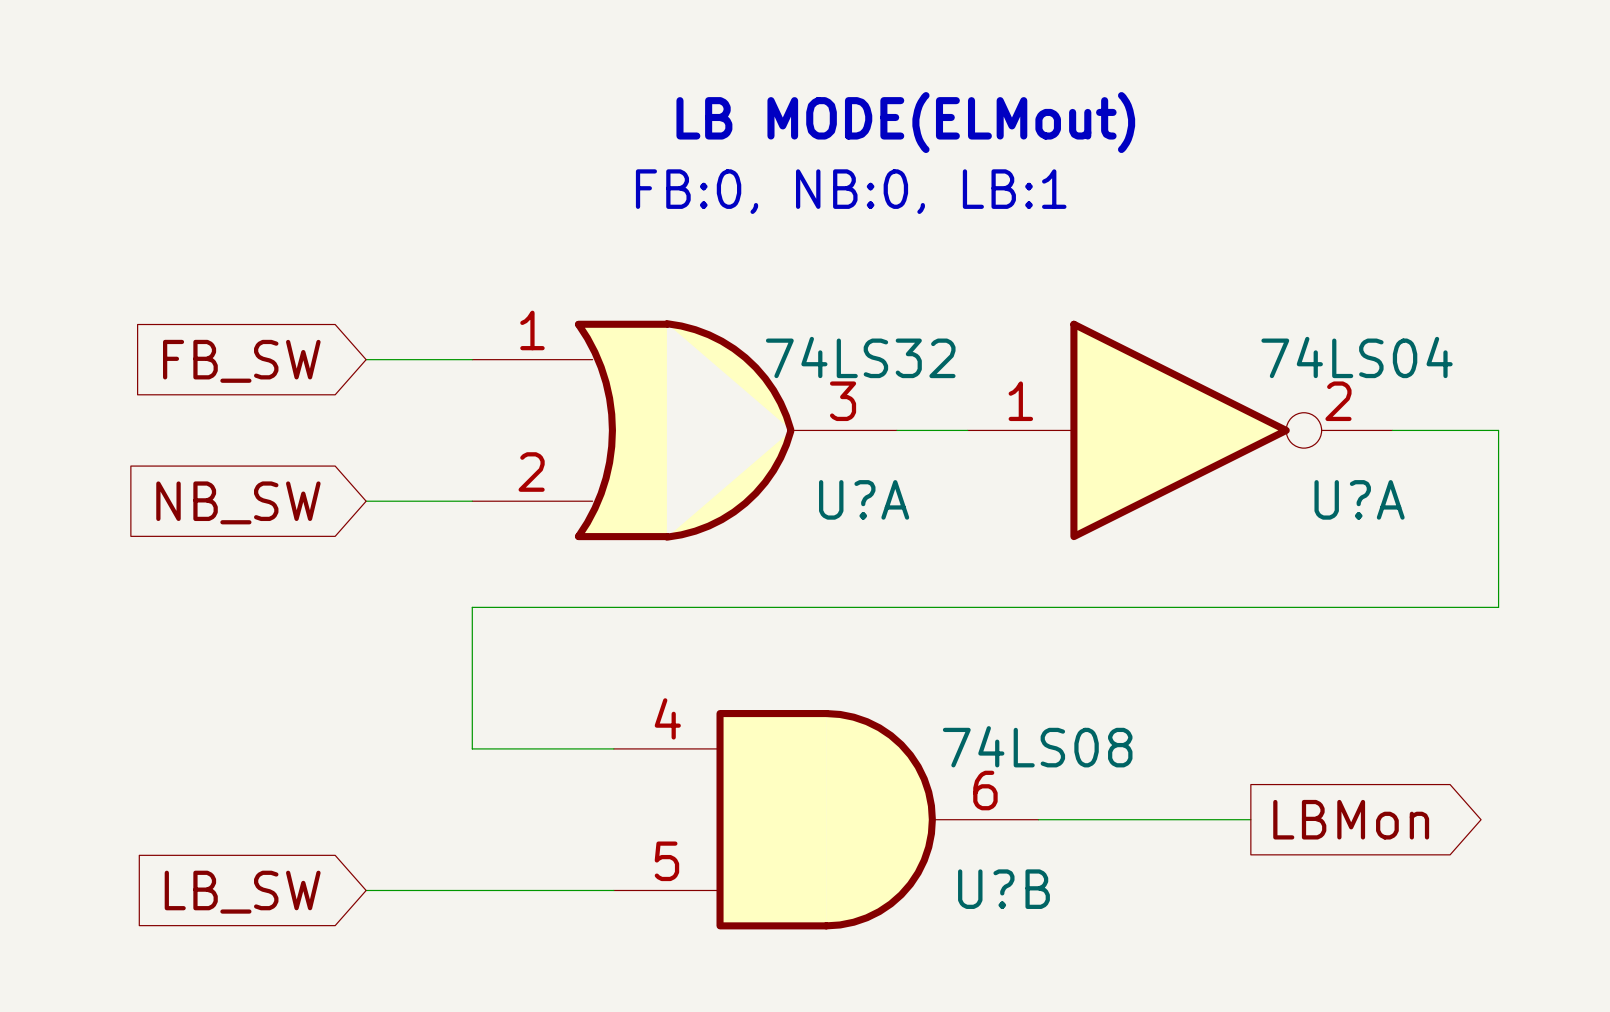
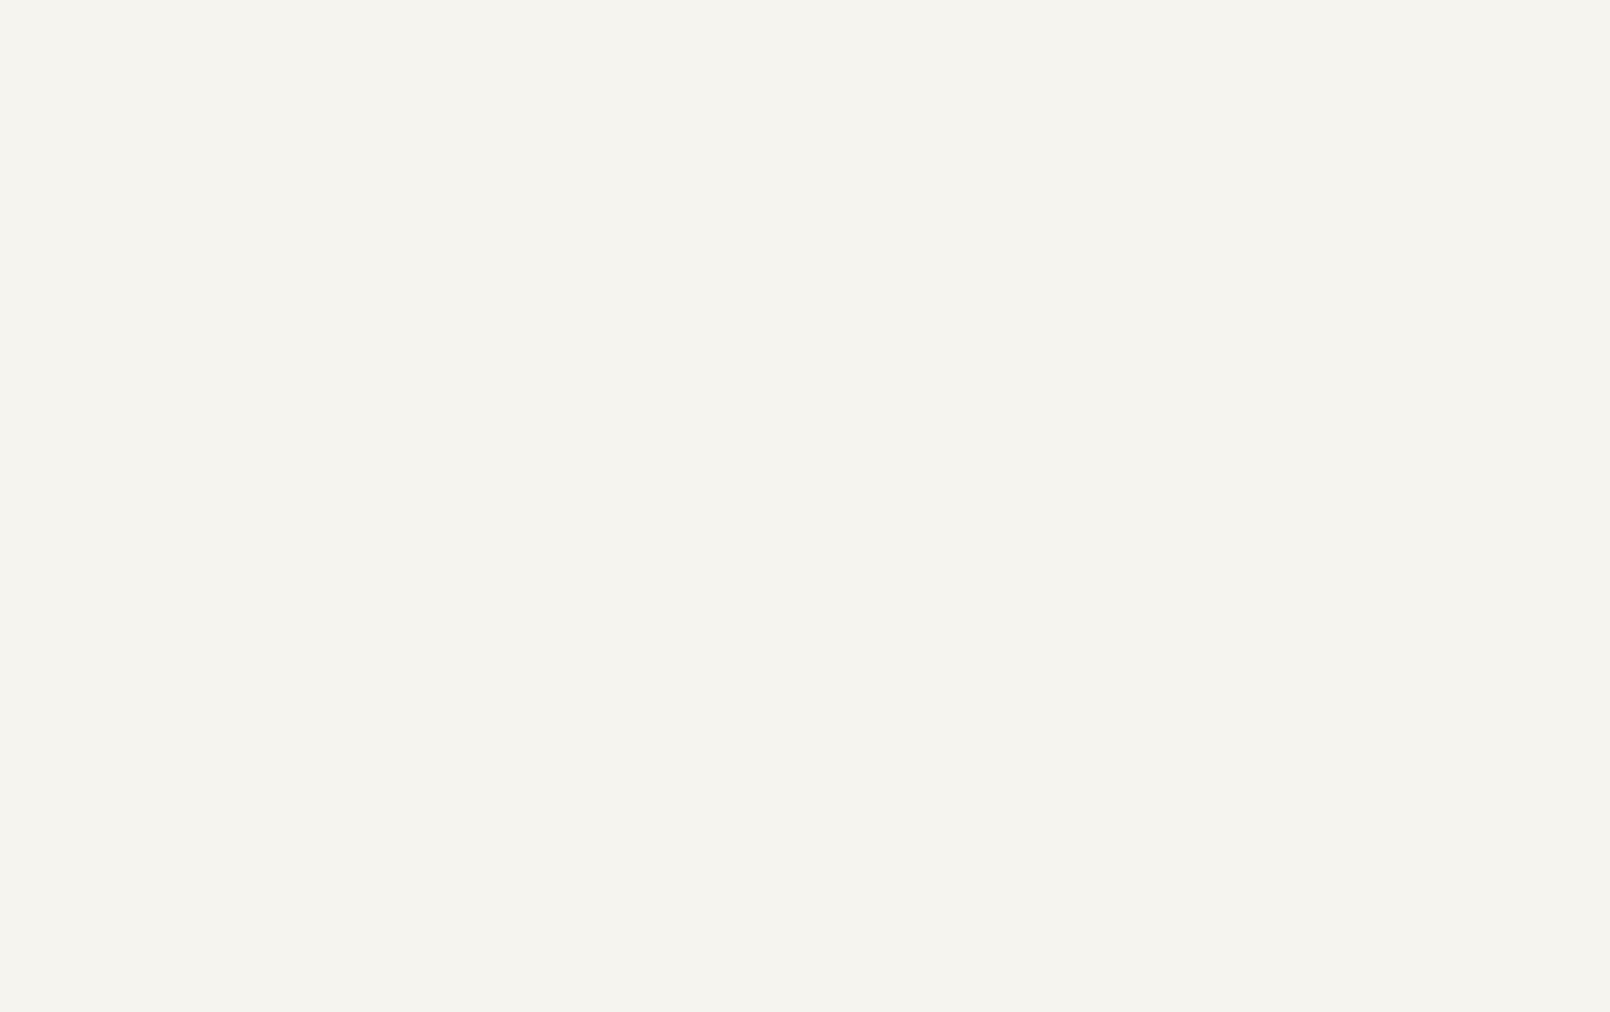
text: LB MODE(ELMout) (905, 122) -> none
text: FB:0, NB:0, LB:1 (851, 191) -> none
wire: (366, 359) (472, 359) -> none
global label: FB_SW (241, 361) -> none
U?A: 74LS32 (684, 430) -> none
wire: (896, 430) (967, 430) -> none
U?A: 74LS04 (1180, 430) -> none
wire: (1392, 430) (1498, 430) (1498, 607) (472, 607) (472, 748) (613, 748) -> none
wire: (366, 501) (472, 501) -> none
global label: NB_SW (238, 502) -> none
U?B: 74LS08 (826, 819) -> none
wire: (1038, 819) (1250, 819) -> none
global label: LBMon (1351, 819) -> none
wire: (366, 890) (613, 890) -> none
global label: LB_SW (242, 892) -> none

